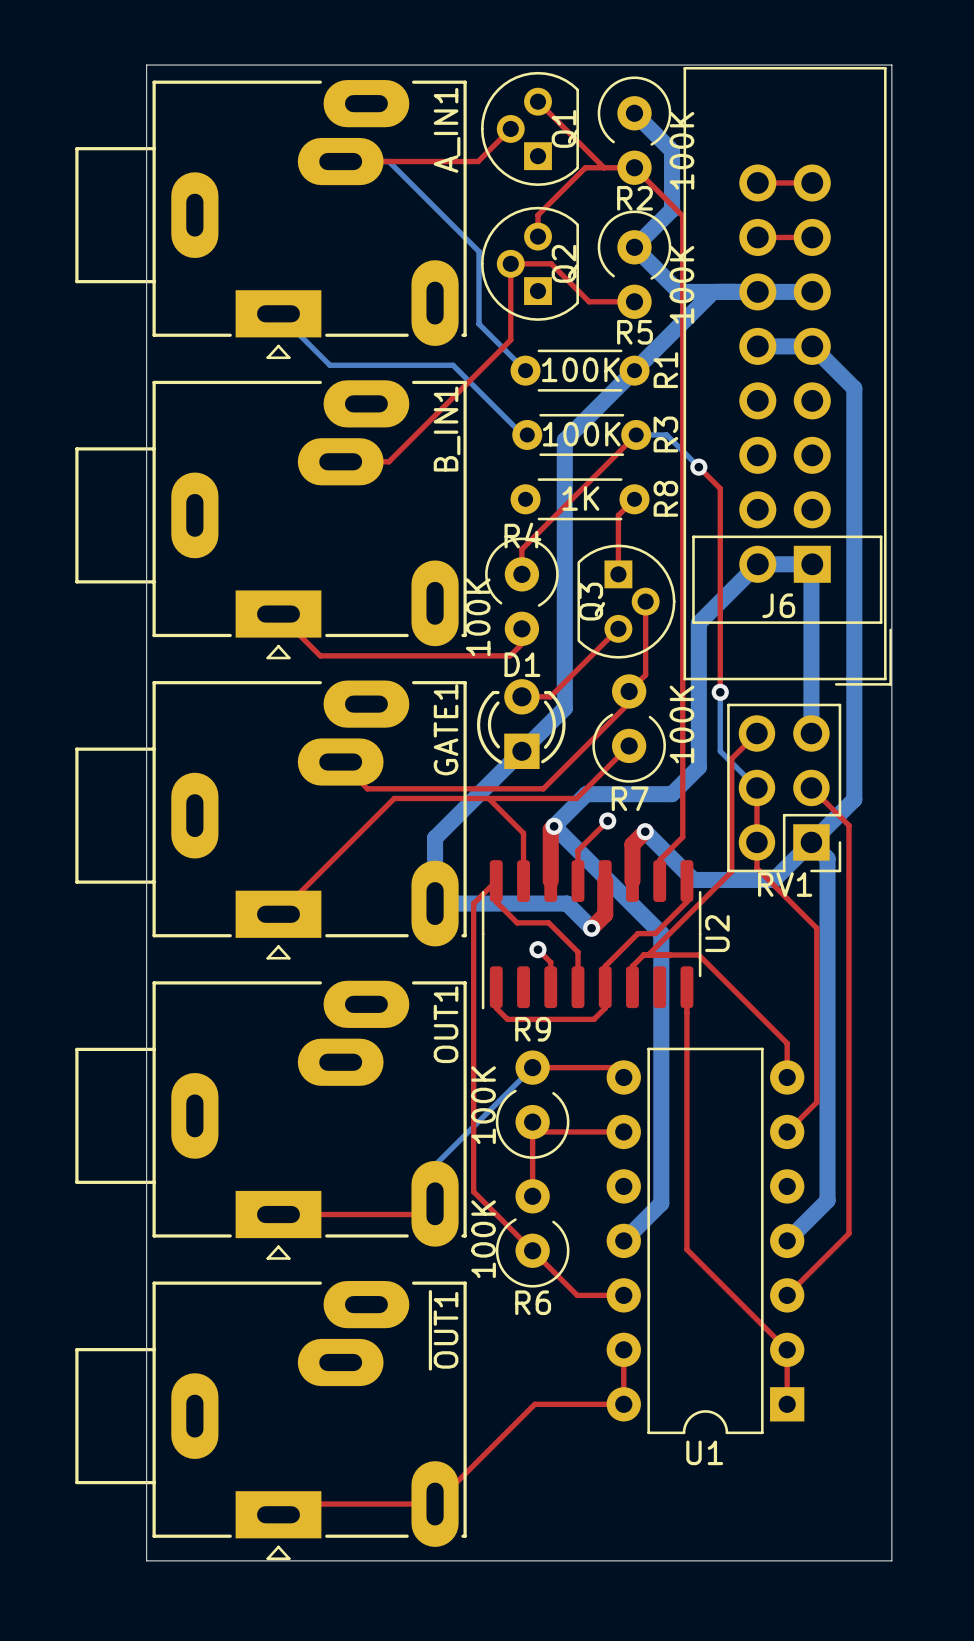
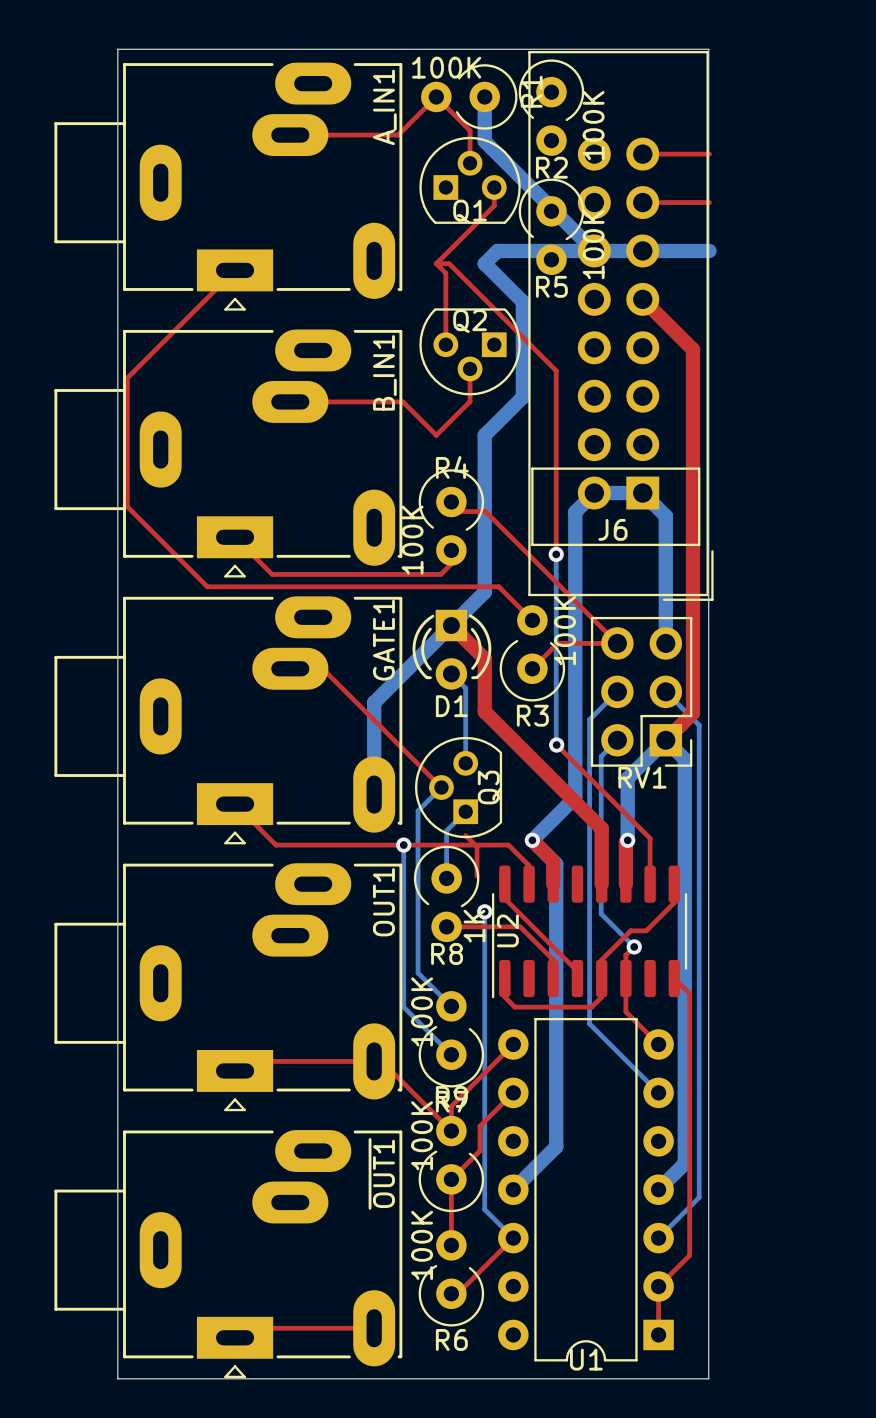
board edge: (811, 65) (891, 65) (891, 1560) (811, 1560) -> (708, 49) (708, 1378)
top track: (538, 101) (604, 167) -> none
bottom track: (634, 113) (672, 150) (672, 209) (634, 247) (679, 291) -> none
bottom track: none -> (484, 96) (484, 141) (594, 250)
top track: (510, 128) (478, 161) (462, 161) -> (470, 163) (470, 130) (436, 96) (398, 135)
Q1 rotation: 0° (529, 128) -> 90° clockwise (470, 180)
Q1 position: (529, 128) -> (470, 180)
bottom track: (340, 161) (388, 161) (479, 251) (479, 324) (525, 370) -> none
top track: none -> (494, 187) (494, 205) (436, 263)
top track: (538, 236) (538, 215) (585, 167) (634, 167) (682, 216) (682, 837) (659, 860) (659, 881) -> none
Q2 rotation: 0° (529, 263) -> 90° counterclockwise (470, 351)
Q2 position: (529, 263) -> (470, 351)
bottom track: (713, 291) (564, 440) (564, 708) (435, 838) -> (591, 250) (497, 250) (484, 263) (522, 301) (522, 397) (484, 435) (484, 592) (374, 702) (374, 736)
top track: (634, 301) (589, 301) (551, 263) (510, 263) (510, 339) (388, 461) -> (470, 368) (470, 401) (436, 435) (402, 401) (333, 401)
top track: none -> (436, 263) (445, 273) (445, 344)
top track: none -> (436, 263) (449, 263) (556, 370) (556, 554)
top track: none -> (235, 270) (127, 378) (127, 506) (207, 586) (498, 586) (532, 620)
bottom track: (278, 313) (329, 365) (453, 365) (521, 434) -> none
top track: none -> (642, 299) (692, 349) (692, 713) (665, 740)
bottom track: (757, 346) (812, 346) (854, 388) (854, 799) (773, 879) (693, 879) (645, 831) -> none
R1 footprint: [510, 349, 650, 392] -> [421, 64, 518, 130]
J6 position: (787, 376) -> (620, 325)
R3 footprint: [512, 413, 652, 456] -> [499, 605, 566, 702]
R3 value position: 100K (581, 434) -> 100K (565, 630)
top track: (636, 434) (521, 549) (521, 574) -> none
bottom track: (636, 434) (666, 434) (698, 467) -> none
R3 name position: R3 (665, 434) -> R3 (532, 715)
top track: (698, 467) (720, 488) (720, 692) -> none
via: (698, 467) -> none
R8 footprint: [510, 478, 650, 521] -> [413, 845, 480, 943]
R8 value position: 1K (580, 498) -> 1K (474, 926)
R8 name position: R8 (665, 498) -> R8 (447, 953)
top track: (634, 499) (618, 515) (618, 574) -> none
line: (693, 536) (693, 622) -> (603, 468) (532, 468) (532, 544) (603, 544)
line: (800, 536) (881, 536) (881, 622) (800, 622) -> (699, 468) (699, 544)
top track: none -> (451, 511) (485, 511) (617, 643) (557, 643) (546, 654)
Q3 rotation: 0° (626, 601) -> 180° (458, 787)
Q3 position: (626, 601) -> (458, 787)
top track: (645, 601) (645, 674) (629, 691) (629, 703) (543, 788) (367, 788) (340, 762) -> (441, 787) (322, 668) (290, 668)
top track: (618, 628) (550, 696) (521, 696) -> none
bottom track: none -> (556, 554) (556, 745)
via: none -> (556, 554)
bottom track: (720, 692) (720, 751) (756, 787) -> none
via: (720, 692) -> none
top track: none -> (451, 625) (484, 658) (484, 711) (601, 828) (601, 884)
D1 rotation: 0° (521, 724) -> 180° (451, 649)
R7 value position: 100K (681, 724) -> 100K (422, 1011)
R7 position: (629, 728) -> (451, 1039)
top track: (756, 733) (731, 758) (731, 871) (648, 955) -> none
bottom track: none -> (665, 643) (665, 516) (642, 493) (594, 493) (575, 512) (575, 797) (532, 840) (556, 864) (556, 1146) (513, 1189)
bottom track: (811, 733) (812, 564) (757, 564) (698, 623) (698, 767) (671, 794) (586, 794) (554, 826) (661, 933) (661, 1203) (623, 1240) -> none
top track: (613, 762) (576, 798) (394, 798) (278, 914) -> (529, 884) (529, 865) (508, 845) (276, 845) (235, 804)
bottom track: none -> (451, 673) (465, 688) (465, 763)
bottom track: none -> (617, 691) (589, 719) (589, 1023) (658, 1092)
top track: (756, 787) (756, 868) (816, 928) (816, 1102) (787, 1131) -> none
bottom track: none -> (665, 691) (699, 725) (699, 1197) (658, 1238)
RV1 position: (784, 787) -> (641, 691)
top track: (811, 787) (848, 825) (848, 1233) (787, 1295) -> none
top track: (488, 798) (523, 833) (523, 881) -> none
top track: (607, 820) (577, 850) (577, 881) -> none
via: (607, 820) -> none
top track: (554, 826) (550, 829) (550, 881) (554, 884) -> none
via: (554, 826) -> none
top track: (645, 831) (632, 844) (632, 881) -> none
via position: (645, 831) -> (556, 745)
bottom track: none -> (617, 740) (601, 756) (601, 913) (634, 946)
bottom track: none -> (665, 740) (627, 778) (627, 840)
bottom track: none -> (665, 740) (684, 759) (684, 1163) (658, 1189)
bottom track: (811, 842) (827, 858) (827, 1200) (787, 1240) -> none
top track: none -> (556, 745) (650, 838) (650, 884)
top track: (605, 881) (605, 914) (591, 928) -> none
top track: (686, 881) (686, 901) (655, 933) (637, 933) (605, 966) (605, 1008) (593, 1019) (507, 1019) (496, 1008) (496, 987) -> (674, 884) (674, 902) (646, 930) (630, 930) (601, 959) (601, 997) (591, 1007) (514, 1007) (504, 997) (504, 978)
bottom track: none -> (441, 787) (418, 810) (418, 972) (451, 1006)
bottom track: (435, 903) (566, 903) (591, 928) -> none
bottom track: none -> (465, 811) (446, 830) (446, 878)
via position: (591, 928) -> (532, 840)
U2 name position: U2 (717, 933) -> U2 (507, 930)
U2 position: (591, 934) -> (589, 931)
via: (538, 949) -> none
top track: none -> (532, 840) (553, 861) (553, 884) (556, 887)
top track: none -> (627, 840) (625, 842) (625, 884)
via: none -> (627, 840)
bottom track: none -> (403, 845) (403, 1007) (451, 1054)
via: none -> (403, 845)
top track: (577, 987) (577, 952) (548, 922) (517, 922) (496, 901) (496, 881) (473, 903) (473, 1191) (577, 1295) (623, 1295) -> none
top track: (632, 987) (632, 966) (643, 955) (698, 955) (787, 1043) (787, 1077) -> none
top track: (686, 987) (686, 1249) (787, 1349) (787, 1404) -> none
top track: none -> (504, 884) (504, 898) (577, 971) (577, 978)
bottom track: none -> (484, 911) (484, 1209) (513, 1238)
via: none -> (484, 911)
top track: none -> (446, 926) (520, 926) (553, 959) (553, 985)
top track: (532, 1067) (613, 1067) (623, 1077) -> none
bottom track: (532, 1067) (435, 1165) (435, 1203) -> none
top track: none -> (634, 946) (625, 955) (625, 1011) (658, 1044)
via: none -> (634, 946)
R9 position: (532, 1104) -> (451, 1163)
R9 value position: 100K (483, 1105) -> 100K (422, 1135)
top track: none -> (674, 978) (689, 993) (689, 1255) (658, 1286) (658, 1334)
top track: (623, 1131) (542, 1131) (532, 1122) (532, 1196) -> none
top track: (435, 1197) (435, 1203) (424, 1214) (278, 1214) -> (513, 1044) (451, 1106) (451, 1131) (381, 1061) (244, 1061) (235, 1070)
R6 position: (532, 1233) -> (451, 1278)
R6 value position: 100K (483, 1239) -> 100K (422, 1245)
top track: none -> (513, 1092) (479, 1126) (479, 1150) (451, 1179) (451, 1245)
U1 position: (705, 1240) -> (585, 1189)
top track: (623, 1349) (623, 1404) (534, 1404) (435, 1504) -> none
top track: none -> (513, 1238) (457, 1293) (451, 1293)
U1 name position: U1 (704, 1452) -> U1 (586, 1359)

